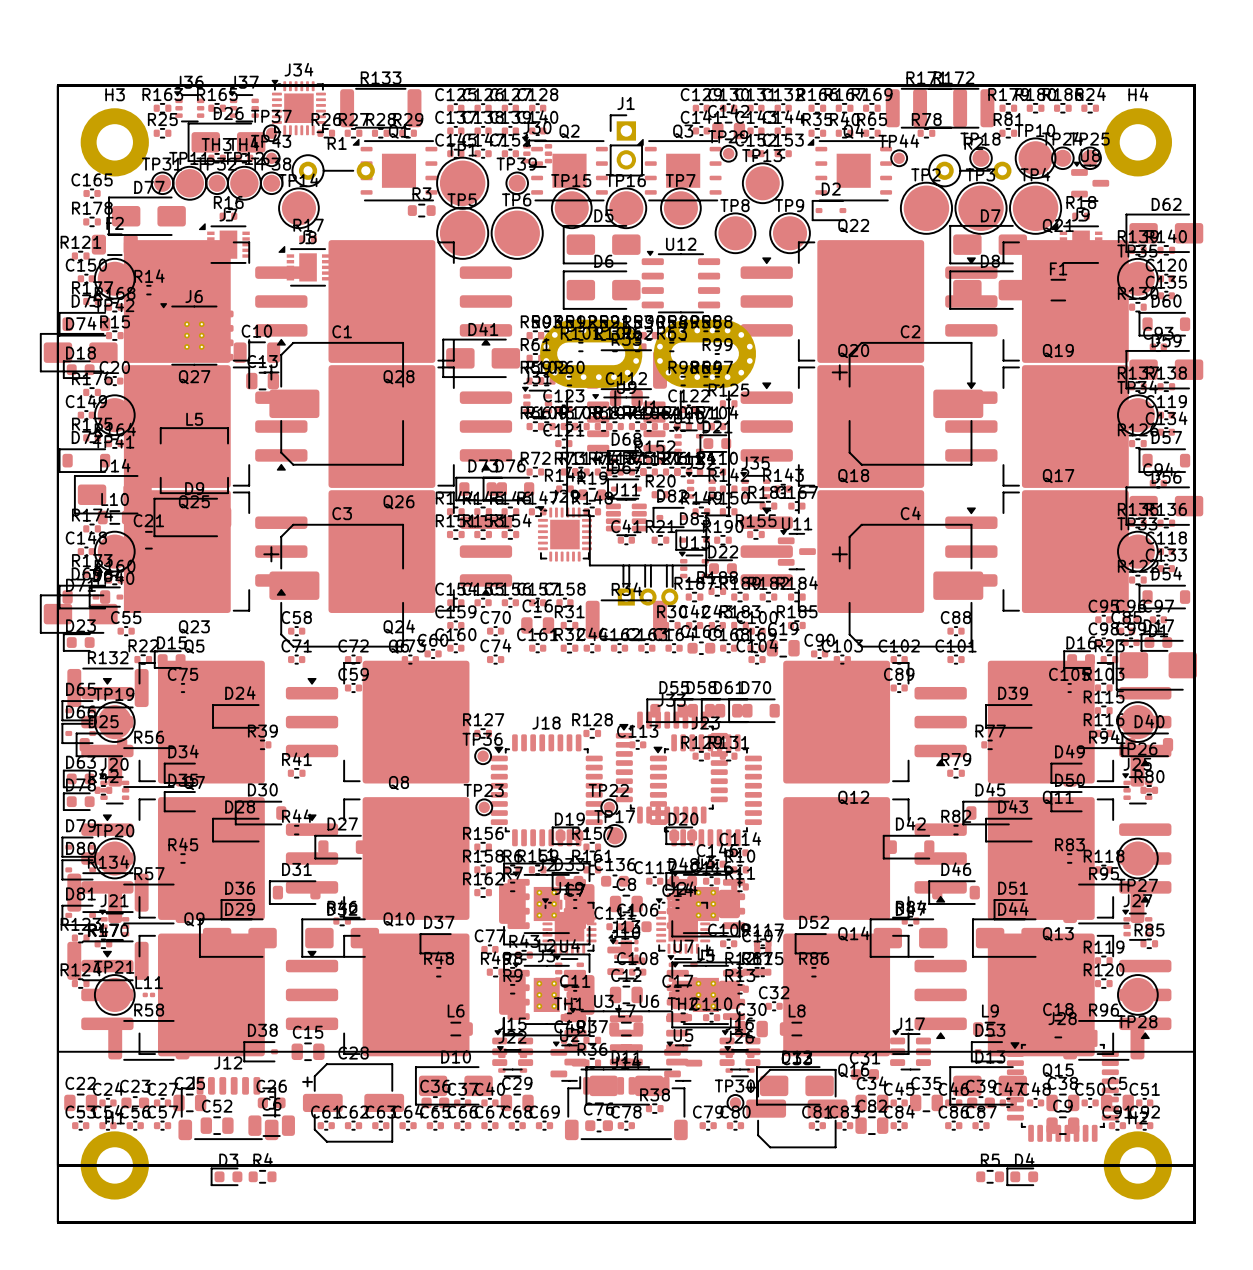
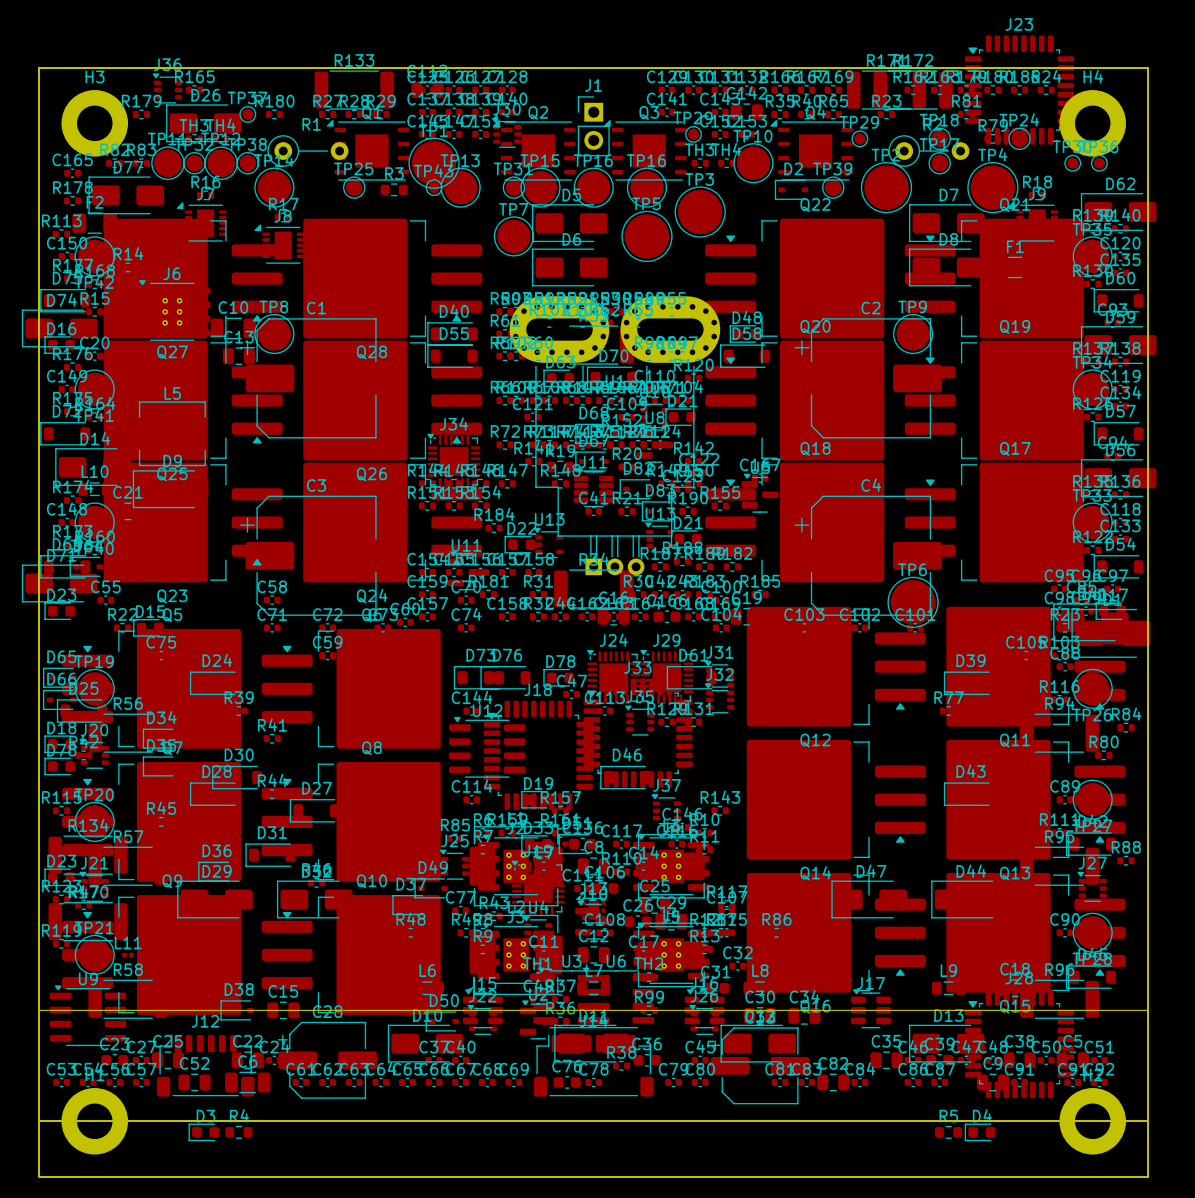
J37 position: (243, 106) -> (666, 809)
J34 position: (298, 107) -> (453, 460)
R163 position: (162, 108) -> (939, 90)
R25 name: R25 (162, 119) -> R179 (141, 101)
R78 name: R78 (926, 119) -> R23 (886, 101)
C142 position: (728, 130) -> (746, 112)
C144 position: (783, 130) -> (471, 711)
R180: none -> (274, 114)
R26: (326, 133) -> none
TP44 name: TP44 (898, 141) -> TP29 (859, 122)
TP43 position: (271, 158) -> (434, 187)
TP10 position: (1035, 158) -> (753, 163)
TP25 position: (1090, 158) -> (354, 187)
TP7 name: TP7 (680, 180) -> TP16 (646, 160)
U8 position: (1090, 181) -> (654, 443)
TP31 position: (162, 183) -> (513, 187)
TP39 position: (517, 183) -> (833, 187)
TH3: none -> (700, 163)
TP13 position: (762, 183) -> (460, 187)
TH4: none -> (726, 163)
TP3 position: (981, 208) -> (700, 212)
TP5 position: (462, 233) -> (646, 236)
TP6 position: (517, 233) -> (913, 602)
TP8 position: (735, 233) -> (274, 333)
TP9 position: (790, 233) -> (913, 333)
R121 name: R121 (80, 242) -> R113 (61, 220)
TP7: none -> (513, 236)
U12 position: (680, 281) -> (487, 747)
R88 position: (717, 335) -> (1125, 860)
D18 name: D18 (80, 353) -> D16 (61, 328)
D41 position: (481, 358) -> (1090, 622)
R99 position: (717, 358) -> (649, 1010)
R125 name: R125 (728, 390) -> R120 (693, 364)
C112 position: (626, 398) -> (427, 90)
J31 position: (537, 402) -> (719, 676)
D63: none -> (558, 378)
C123 position: (563, 409) -> (682, 489)
C122 position: (688, 409) -> (699, 472)
U9 position: (626, 425) -> (88, 1015)
R110 position: (717, 472) -> (621, 871)
J32 position: (700, 487) -> (719, 698)
J35 position: (755, 487) -> (639, 720)
D73 position: (481, 489) -> (478, 677)
D76 position: (508, 489) -> (505, 677)
R143 position: (783, 489) -> (720, 810)
R181 position: (768, 506) -> (488, 594)
J29 position: (564, 533) -> (666, 677)
U11 position: (796, 549) -> (466, 570)
D22 name: D22 (723, 551) -> D21 (688, 522)
U13: none -> (548, 543)
D22: none -> (519, 544)
R184 position: (796, 597) -> (493, 528)
C16 position: (537, 625) -> (613, 616)
C88 position: (956, 631) -> (1065, 666)
C160 name: C160 (455, 634) -> C157 (427, 603)
C161 name: C161 (537, 634) -> C158 (507, 603)
C90 position: (819, 653) -> (1065, 932)
D16: (1079, 659) -> none
R132: (107, 688) -> none
C89 position: (899, 688) -> (1065, 799)
D78: none -> (558, 677)
D55 position: (672, 710) -> (452, 356)
D58 position: (699, 710) -> (744, 356)
D70 position: (754, 710) -> (611, 378)
R115 position: (1103, 710) -> (61, 810)
Q12 position: (875, 722) -> (836, 666)
Q11 position: (1079, 722) -> (1035, 666)
C47: none -> (571, 694)
R127: (483, 733) -> none
R128: (592, 733) -> none
D40 position: (1147, 744) -> (452, 333)
TP36 position: (483, 756) -> (1099, 163)
D63 name: D63 (80, 762) -> D18 (61, 728)
R79 position: (956, 773) -> (992, 138)
D49 position: (1067, 773) -> (431, 888)
J25 position: (1137, 788) -> (454, 864)
J18 position: (546, 790) -> (538, 755)
J23 position: (705, 790) -> (1019, 90)
D50 position: (1067, 801) -> (442, 1021)
TP23: (484, 807) -> none
TP22: (609, 807) -> none
D45 position: (988, 813) -> (1090, 977)
R82 position: (956, 830) -> (114, 163)
TP17 position: (614, 835) -> (939, 163)
D20: (681, 835) -> none
D79: (78, 847) -> none
R156: (483, 847) -> none
D42 position: (908, 847) -> (1090, 844)
C114 position: (740, 852) -> (471, 799)
R118 name: R118 (1104, 856) -> R111 (1059, 819)
Q14 position: (875, 858) -> (836, 799)
R83 position: (1069, 858) -> (141, 163)
Q13 position: (1079, 858) -> (1035, 799)
TP27 position: (1137, 858) -> (1092, 799)
D80: (78, 869) -> none
R158: (483, 869) -> none
D48 position: (681, 881) -> (744, 333)
R162 position: (483, 892) -> (913, 90)
D46 position: (954, 892) -> (625, 777)
D51 position: (1011, 909) -> (575, 844)
D81: (78, 915) -> none
D23: none -> (59, 877)
R84 position: (910, 921) -> (1125, 727)
J24 position: (682, 926) -> (613, 677)
C25: none -> (654, 905)
C109 position: (728, 943) -> (627, 417)
D52: (812, 943) -> none
R85 position: (1149, 943) -> (455, 838)
R119: (1103, 960) -> none
R124 name: R124 (81, 969) -> R119 (61, 930)
U7: (682, 970) -> none
R120: (1103, 983) -> none
Q16 position: (875, 994) -> (836, 932)
Q15 position: (1079, 994) -> (1035, 932)
TP28 position: (1137, 994) -> (1092, 932)
C110 position: (711, 1017) -> (654, 389)
C30 position: (751, 1029) -> (760, 1015)
D53: (988, 1051) -> none
U5 position: (683, 1061) -> (760, 493)
C31 position: (865, 1074) -> (715, 988)
C22 position: (80, 1102) -> (247, 1060)
C24 position: (107, 1102) -> (274, 1060)
C26 position: (271, 1102) -> (638, 921)
C36 position: (435, 1102) -> (646, 1060)
C29 position: (517, 1102) -> (671, 921)
TP30 position: (735, 1102) -> (1072, 163)
C34 position: (871, 1102) -> (804, 1015)
C45 position: (899, 1102) -> (700, 1060)
C9 position: (1062, 1125) -> (992, 1082)
C91: none -> (1019, 1082)

